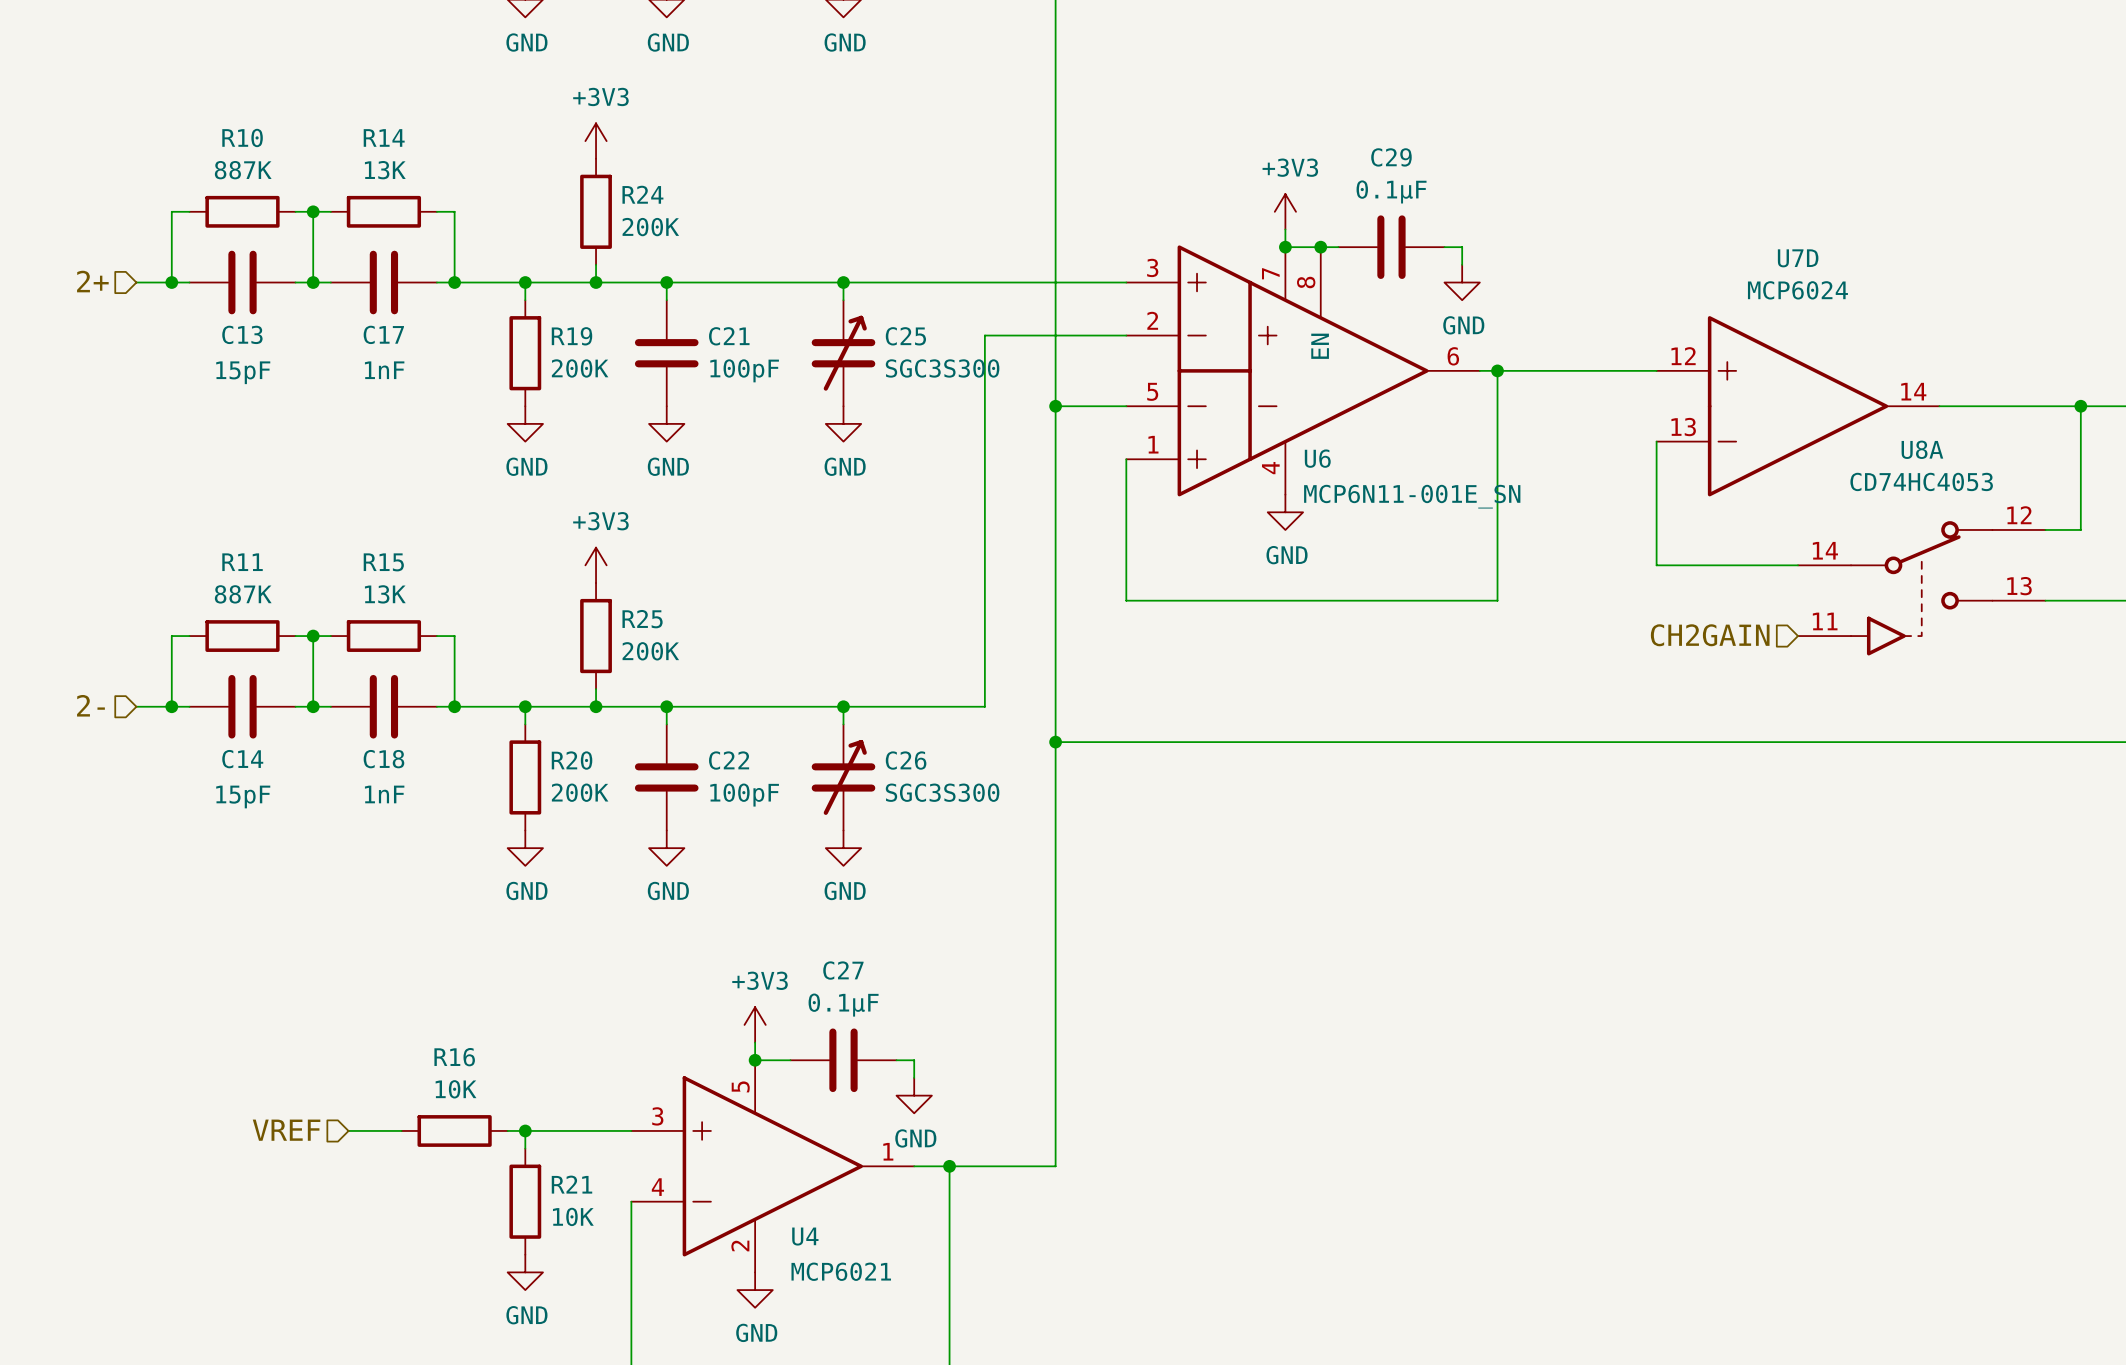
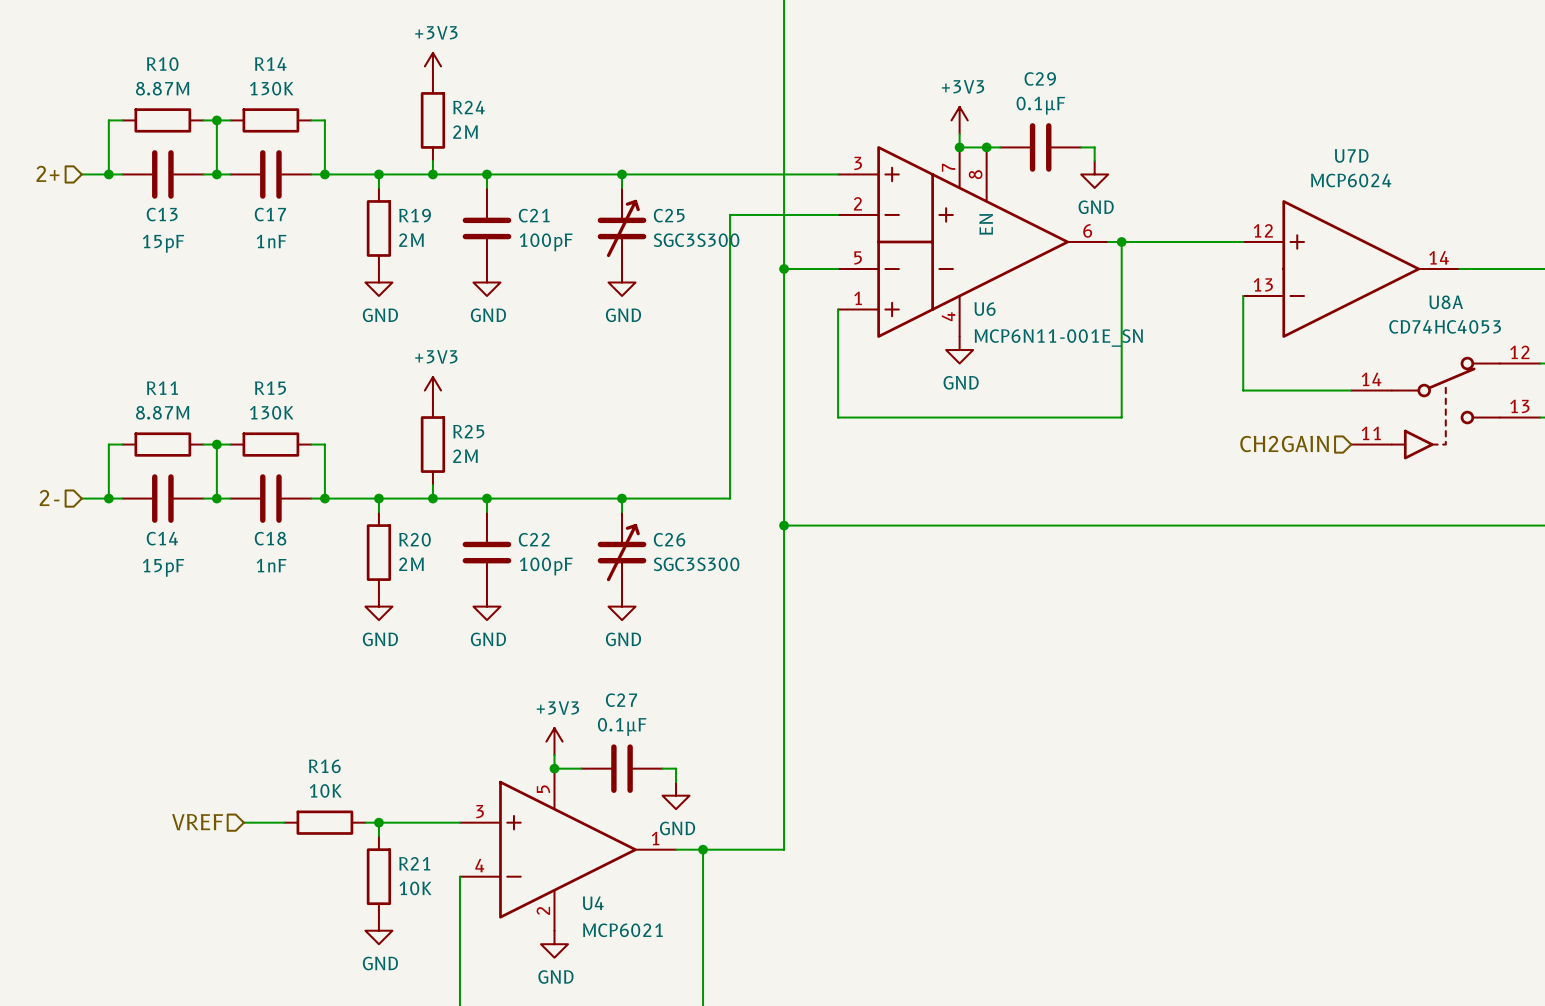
R10 value: 887K (243, 170) -> 8.87M (162, 88)
R14 value: 13K (385, 170) -> 130K (271, 88)
R24 value: 200K (650, 227) -> 2M (465, 132)
R19 value: 200K (580, 368) -> 2M (411, 240)
R11 value: 887K (243, 594) -> 8.87M (162, 412)
R15 value: 13K (385, 594) -> 130K (271, 412)
R25 value: 200K (650, 651) -> 2M (465, 456)
R20 value: 200K (580, 792) -> 2M (411, 564)

